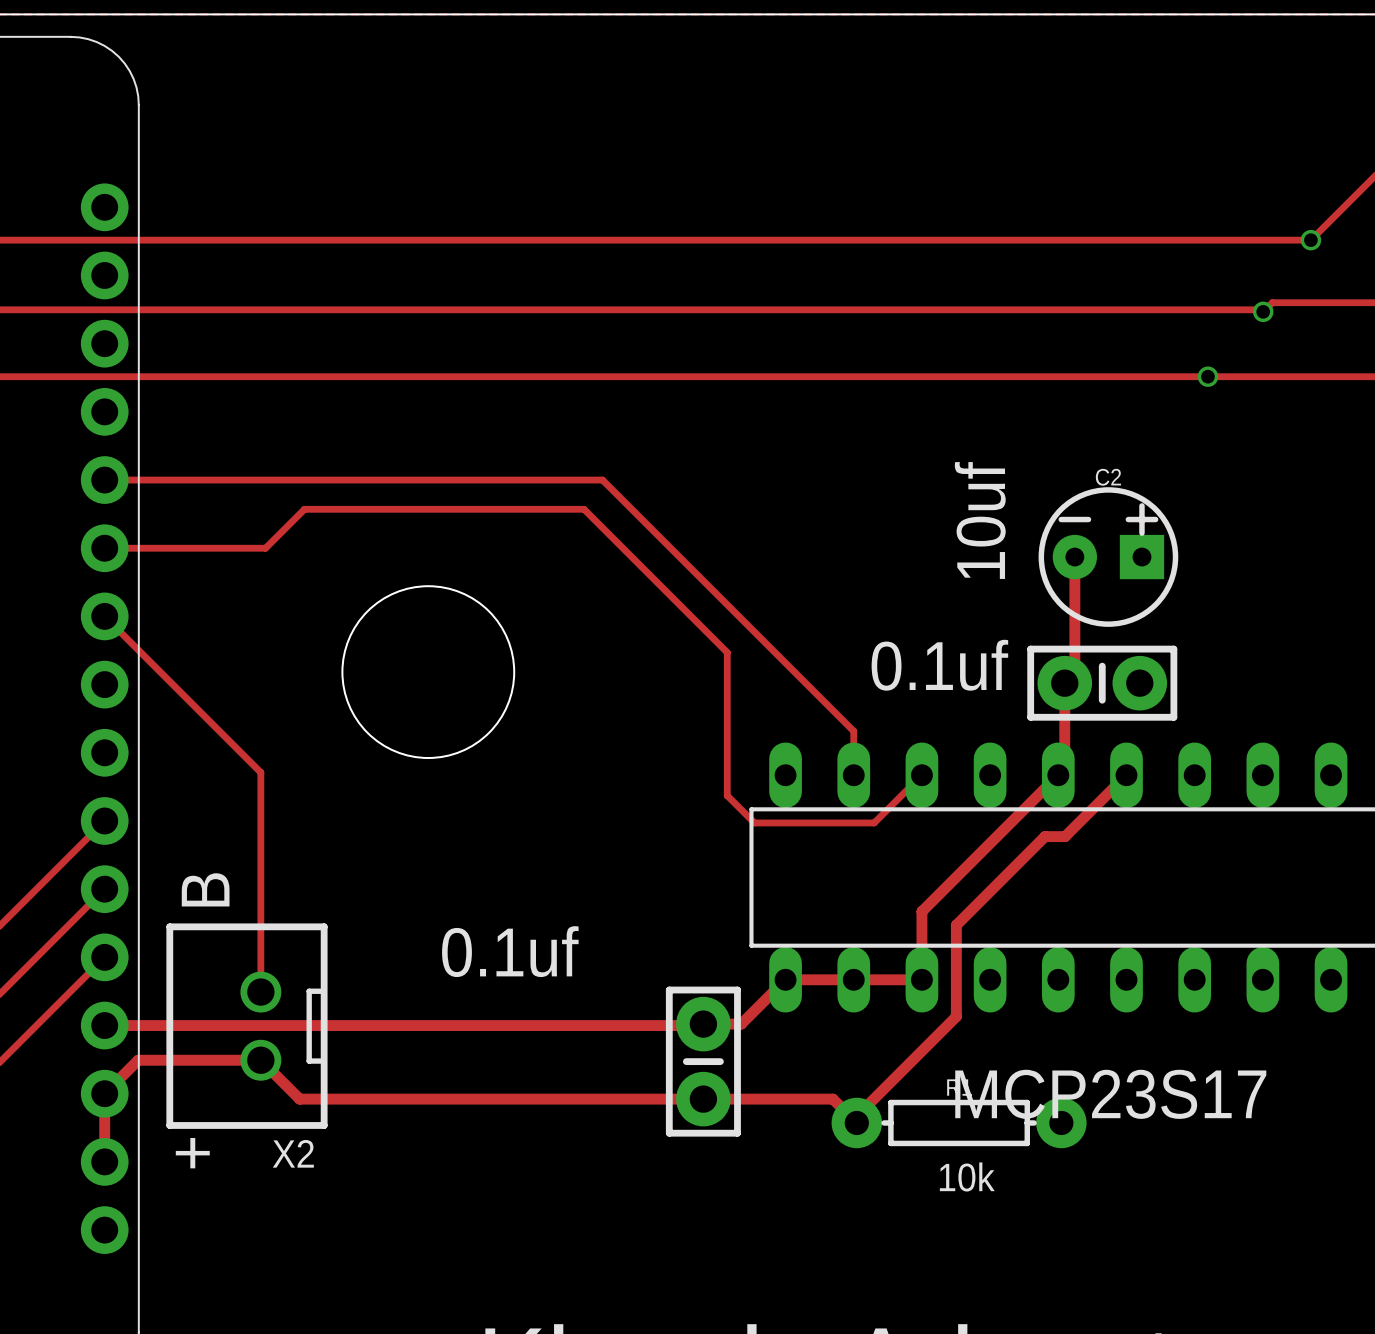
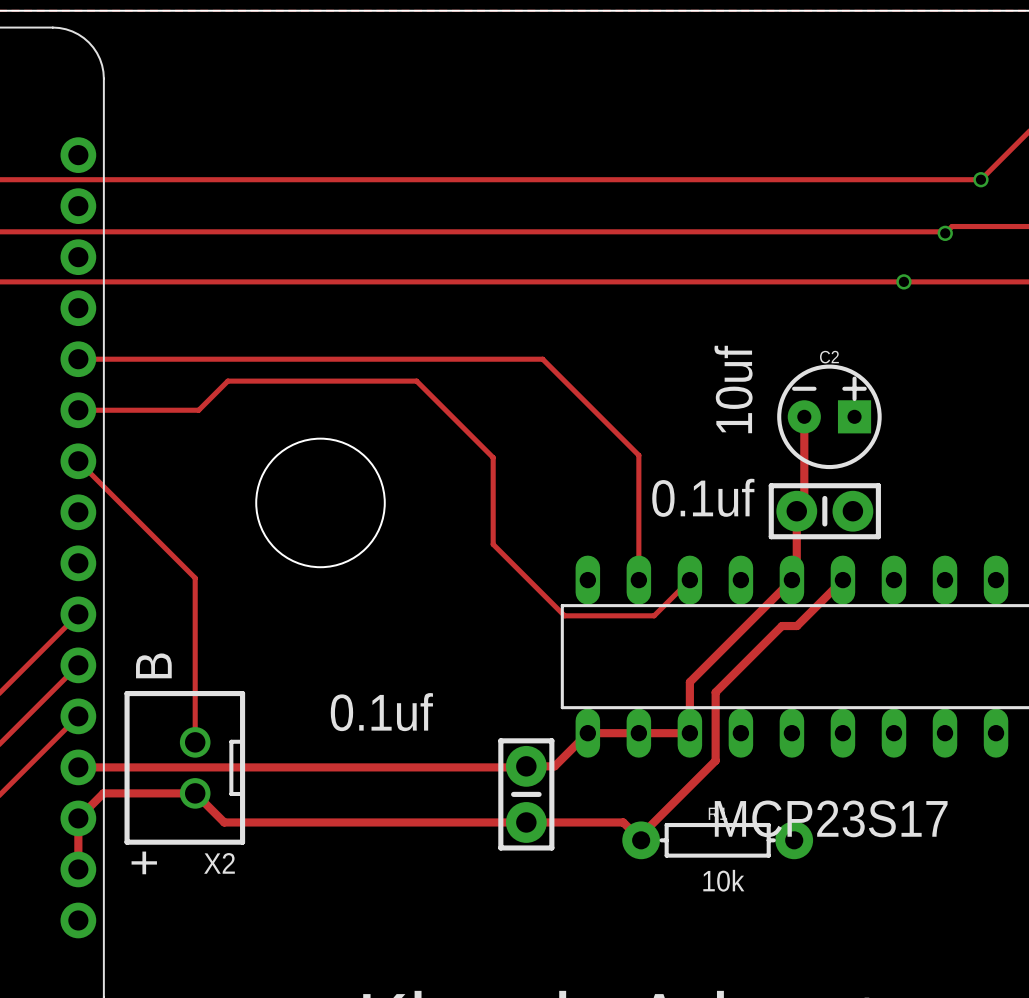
track: (602, 480) (853, 731) -> (450, 359) (542, 359) (638, 455) (638, 547)
track: (556, 509) (584, 509) (727, 652) (727, 795) -> (416, 381) (493, 457) (493, 544) (544, 595)

